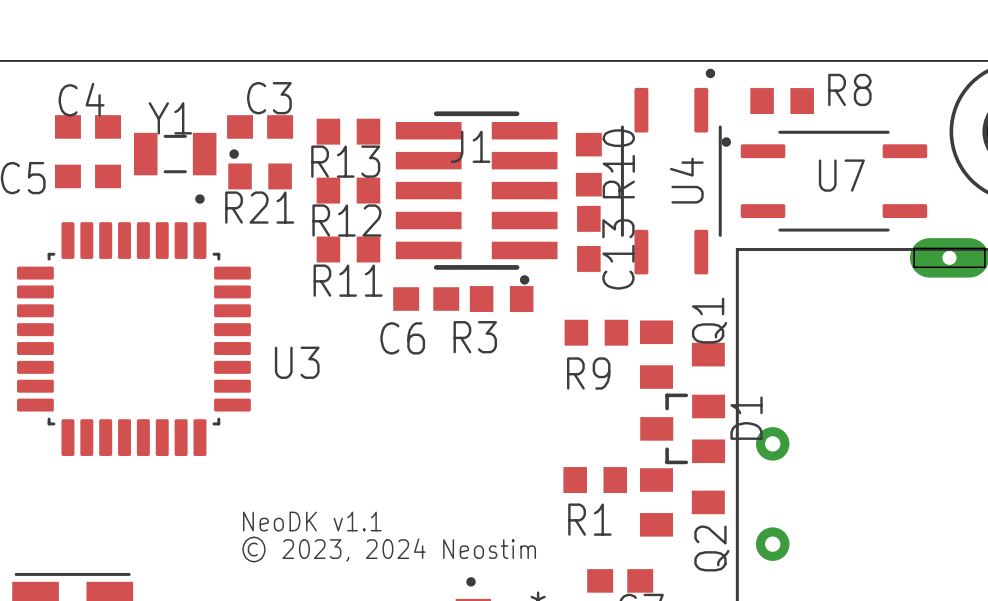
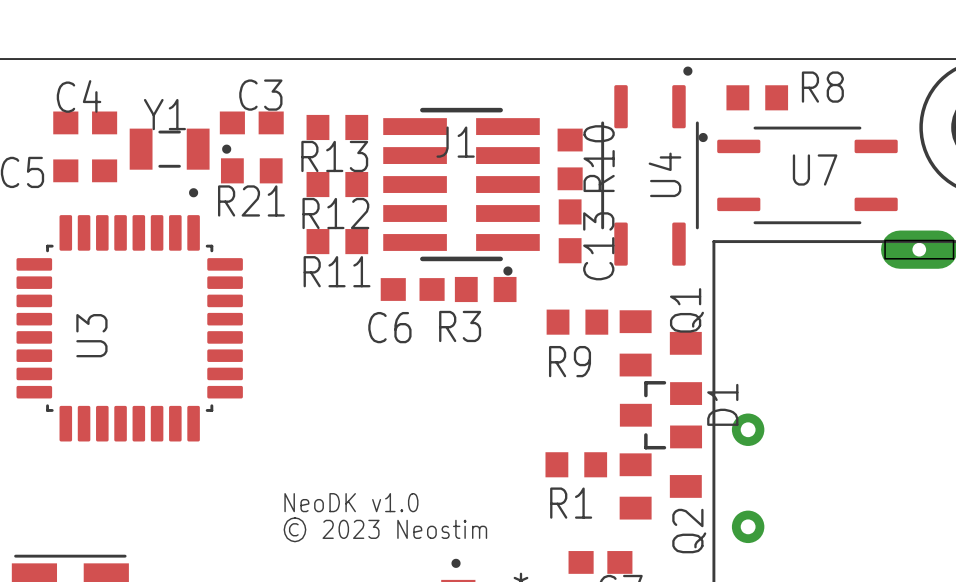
U3 name rotation: 0° (297, 362) -> 90° counterclockwise (91, 335)
U3 name position: U3 (297, 362) -> U3 (91, 335)
text: NeoDK v1.1 (312, 521) -> NeoDK v1.0 (351, 502)
text: © 2023, 2024 Neostim (389, 549) -> © 2023 Neostim (385, 529)

